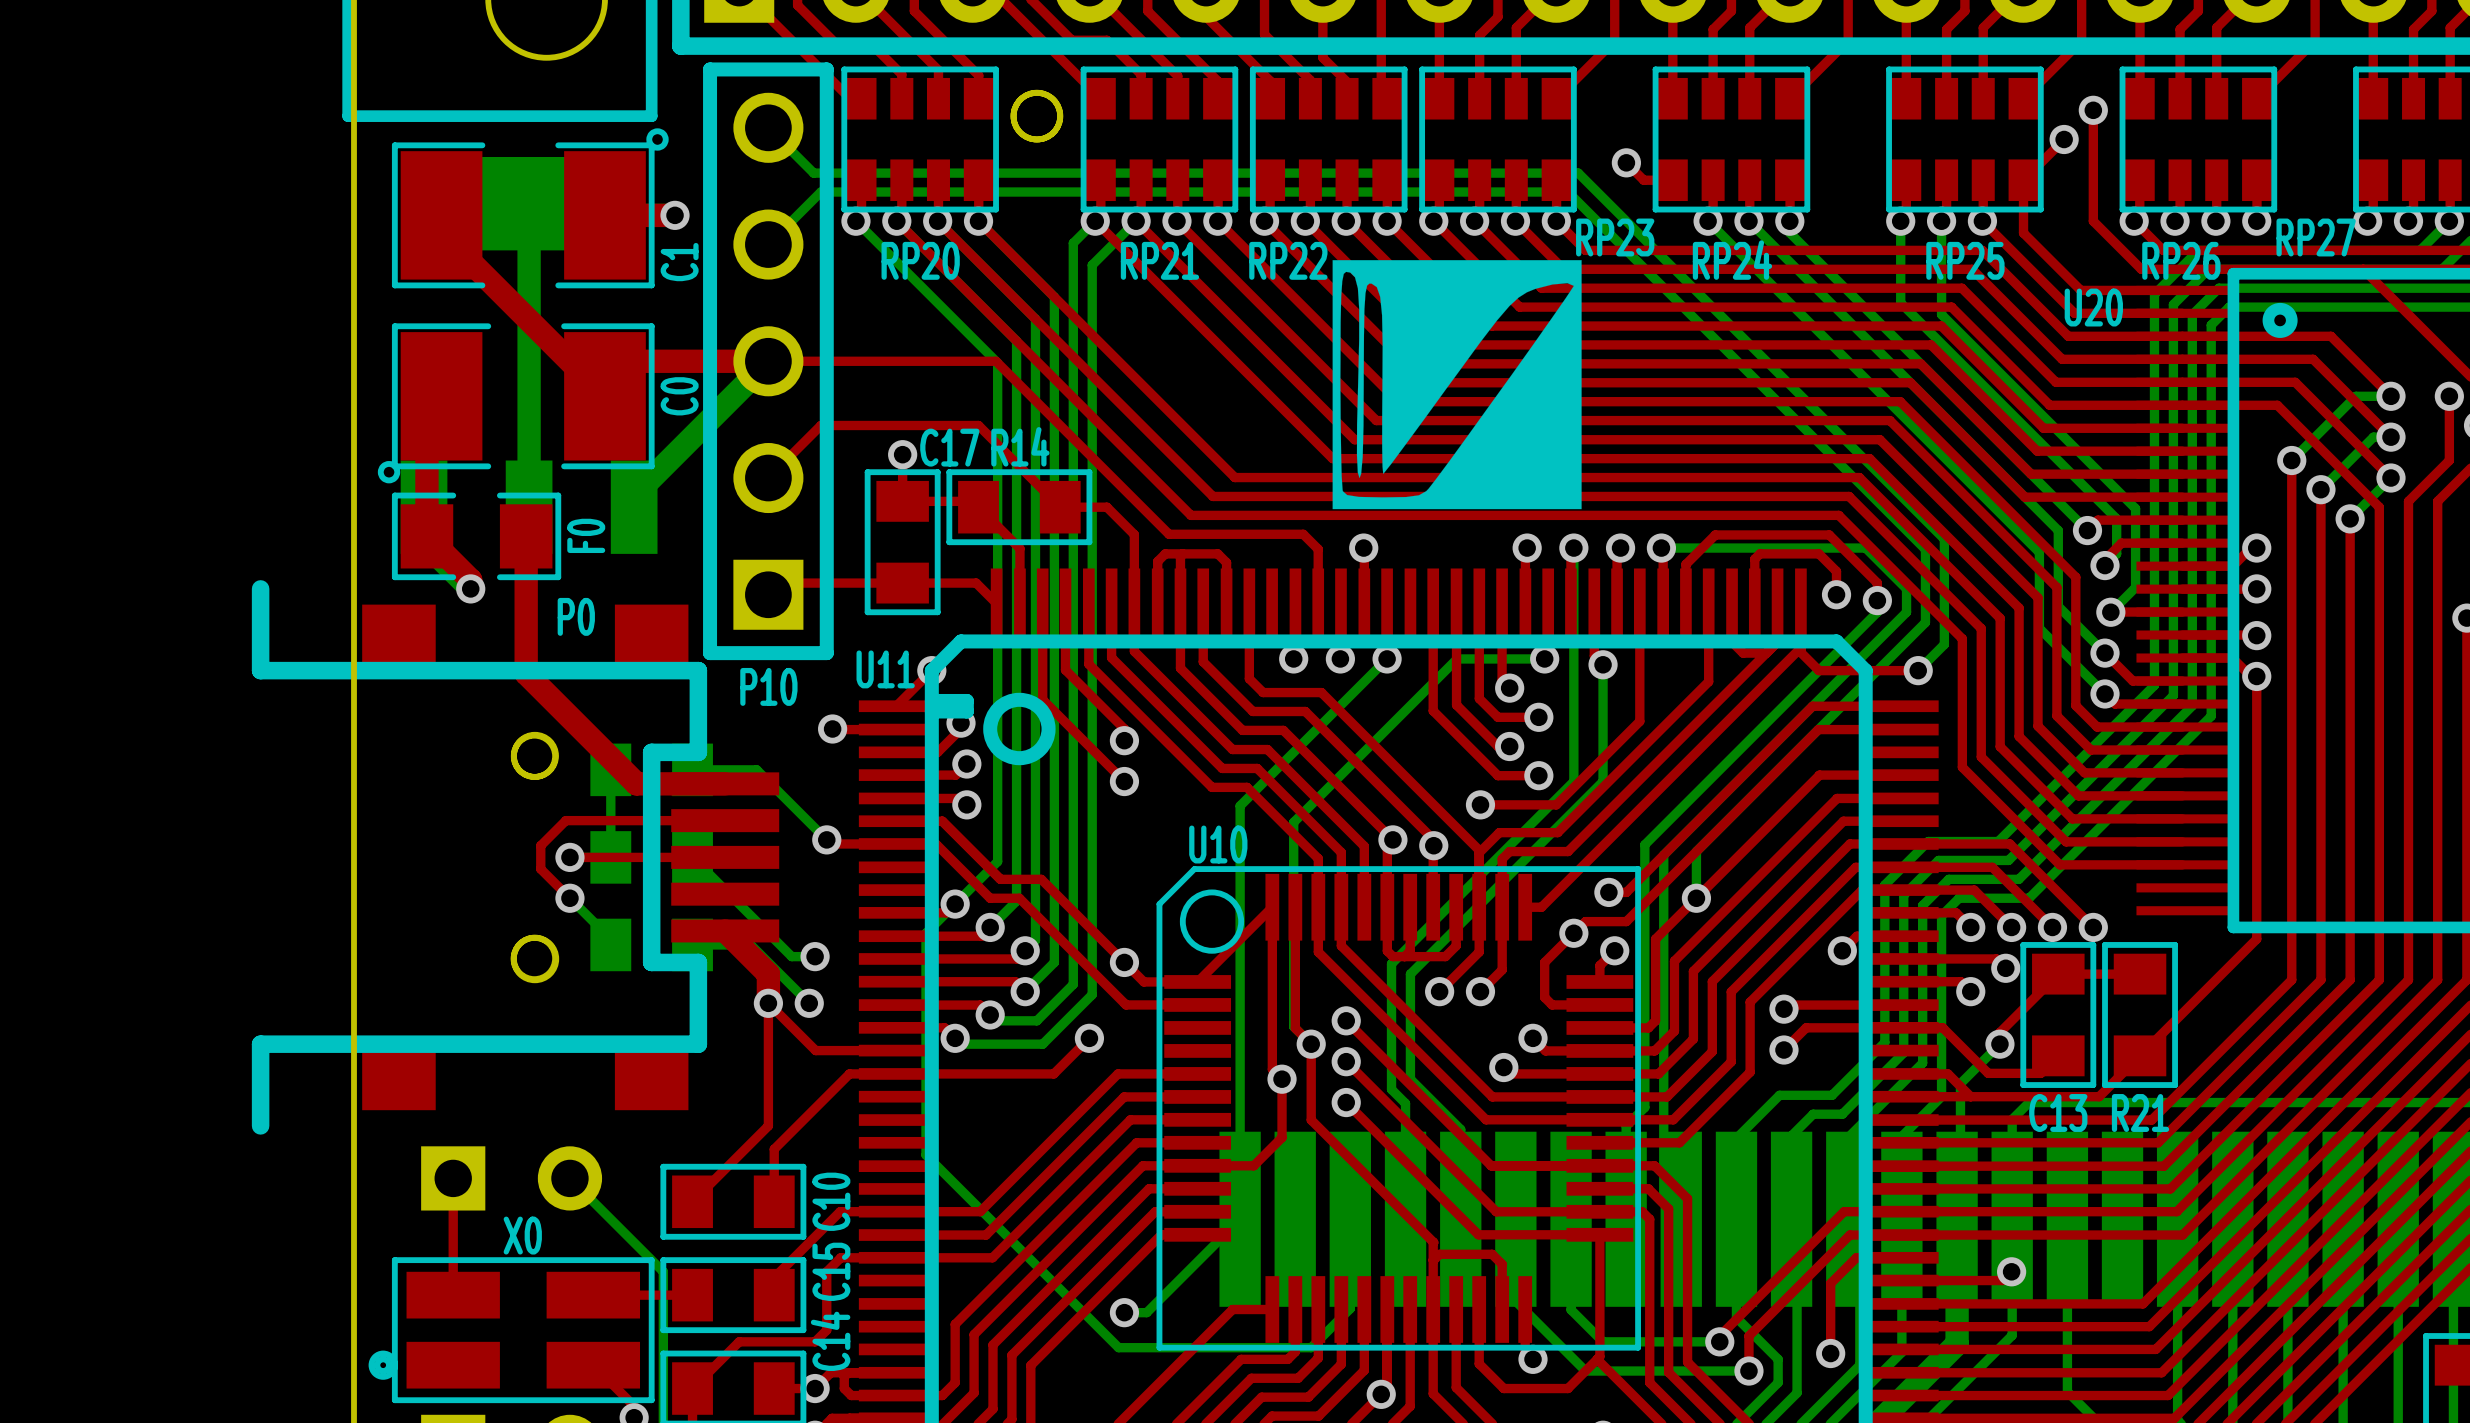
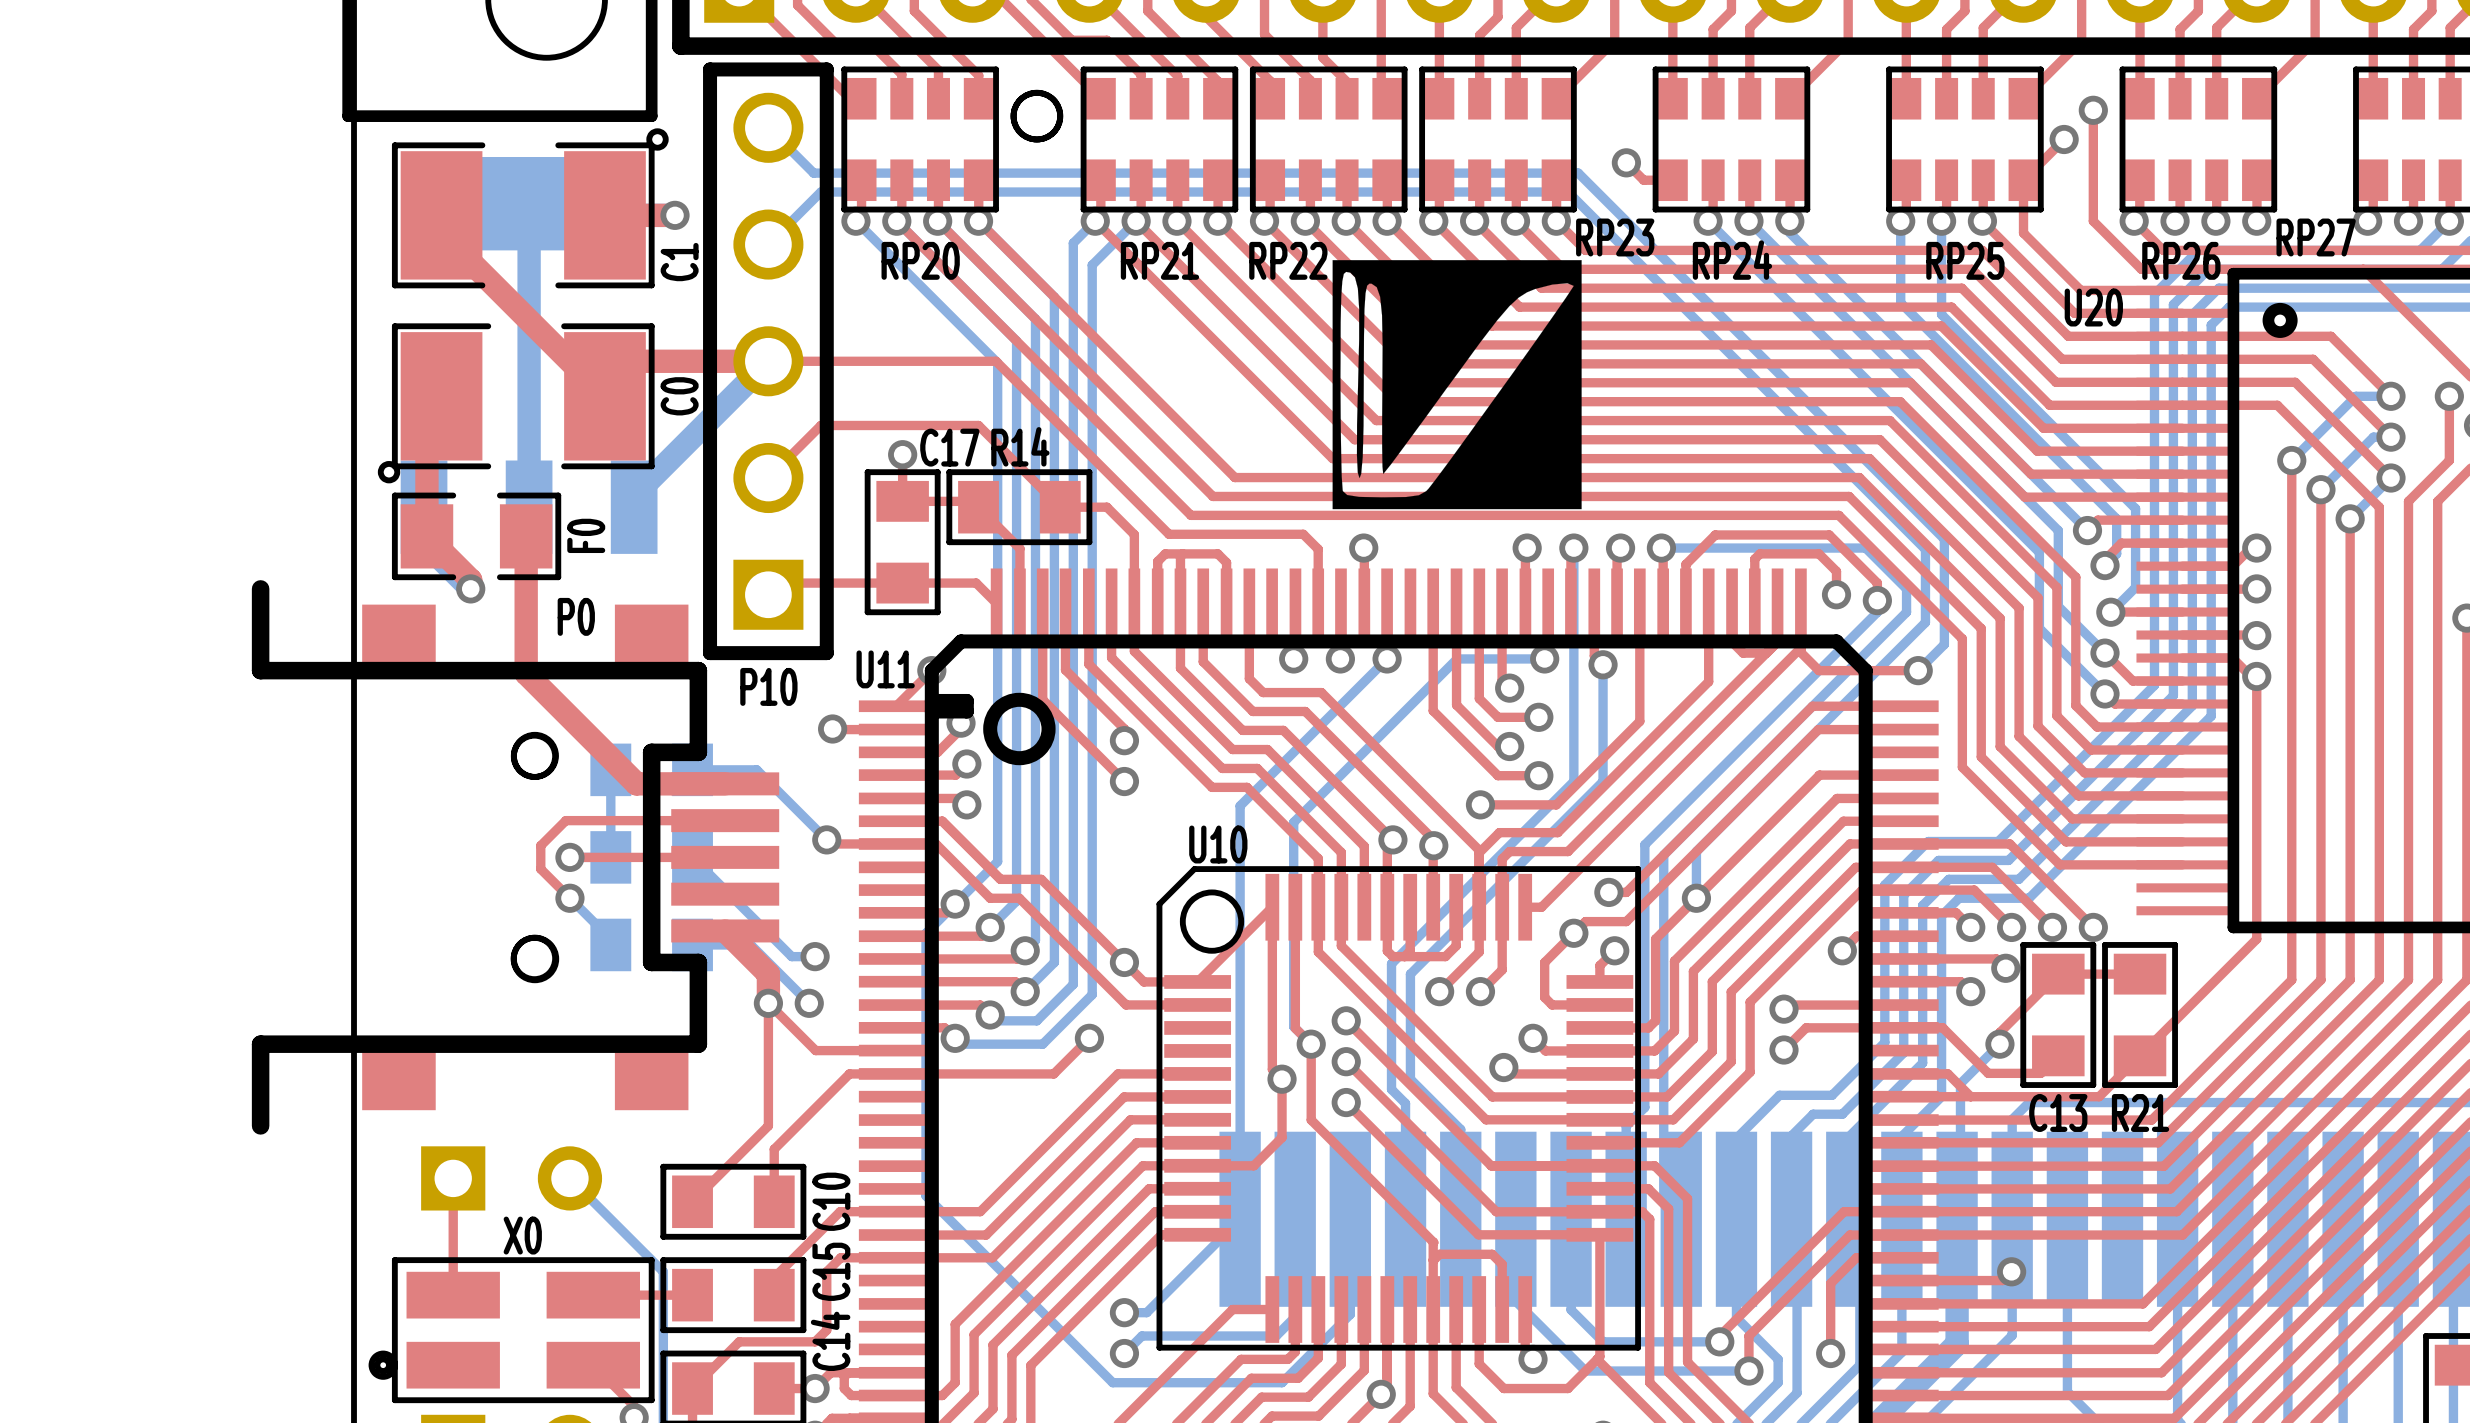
bottom track: (925, 1155) (1118, 1347) (1311, 1347) (1350, 1308) -> (925, 1155) (925, 1195) (1112, 1382) (1282, 1382) (1350, 1314) (1350, 1308)
bottom track: none -> (1295, 1219) (1295, 1316) (1276, 1336) (1141, 1336) (1124, 1353)
via: none -> (1124, 1353)

